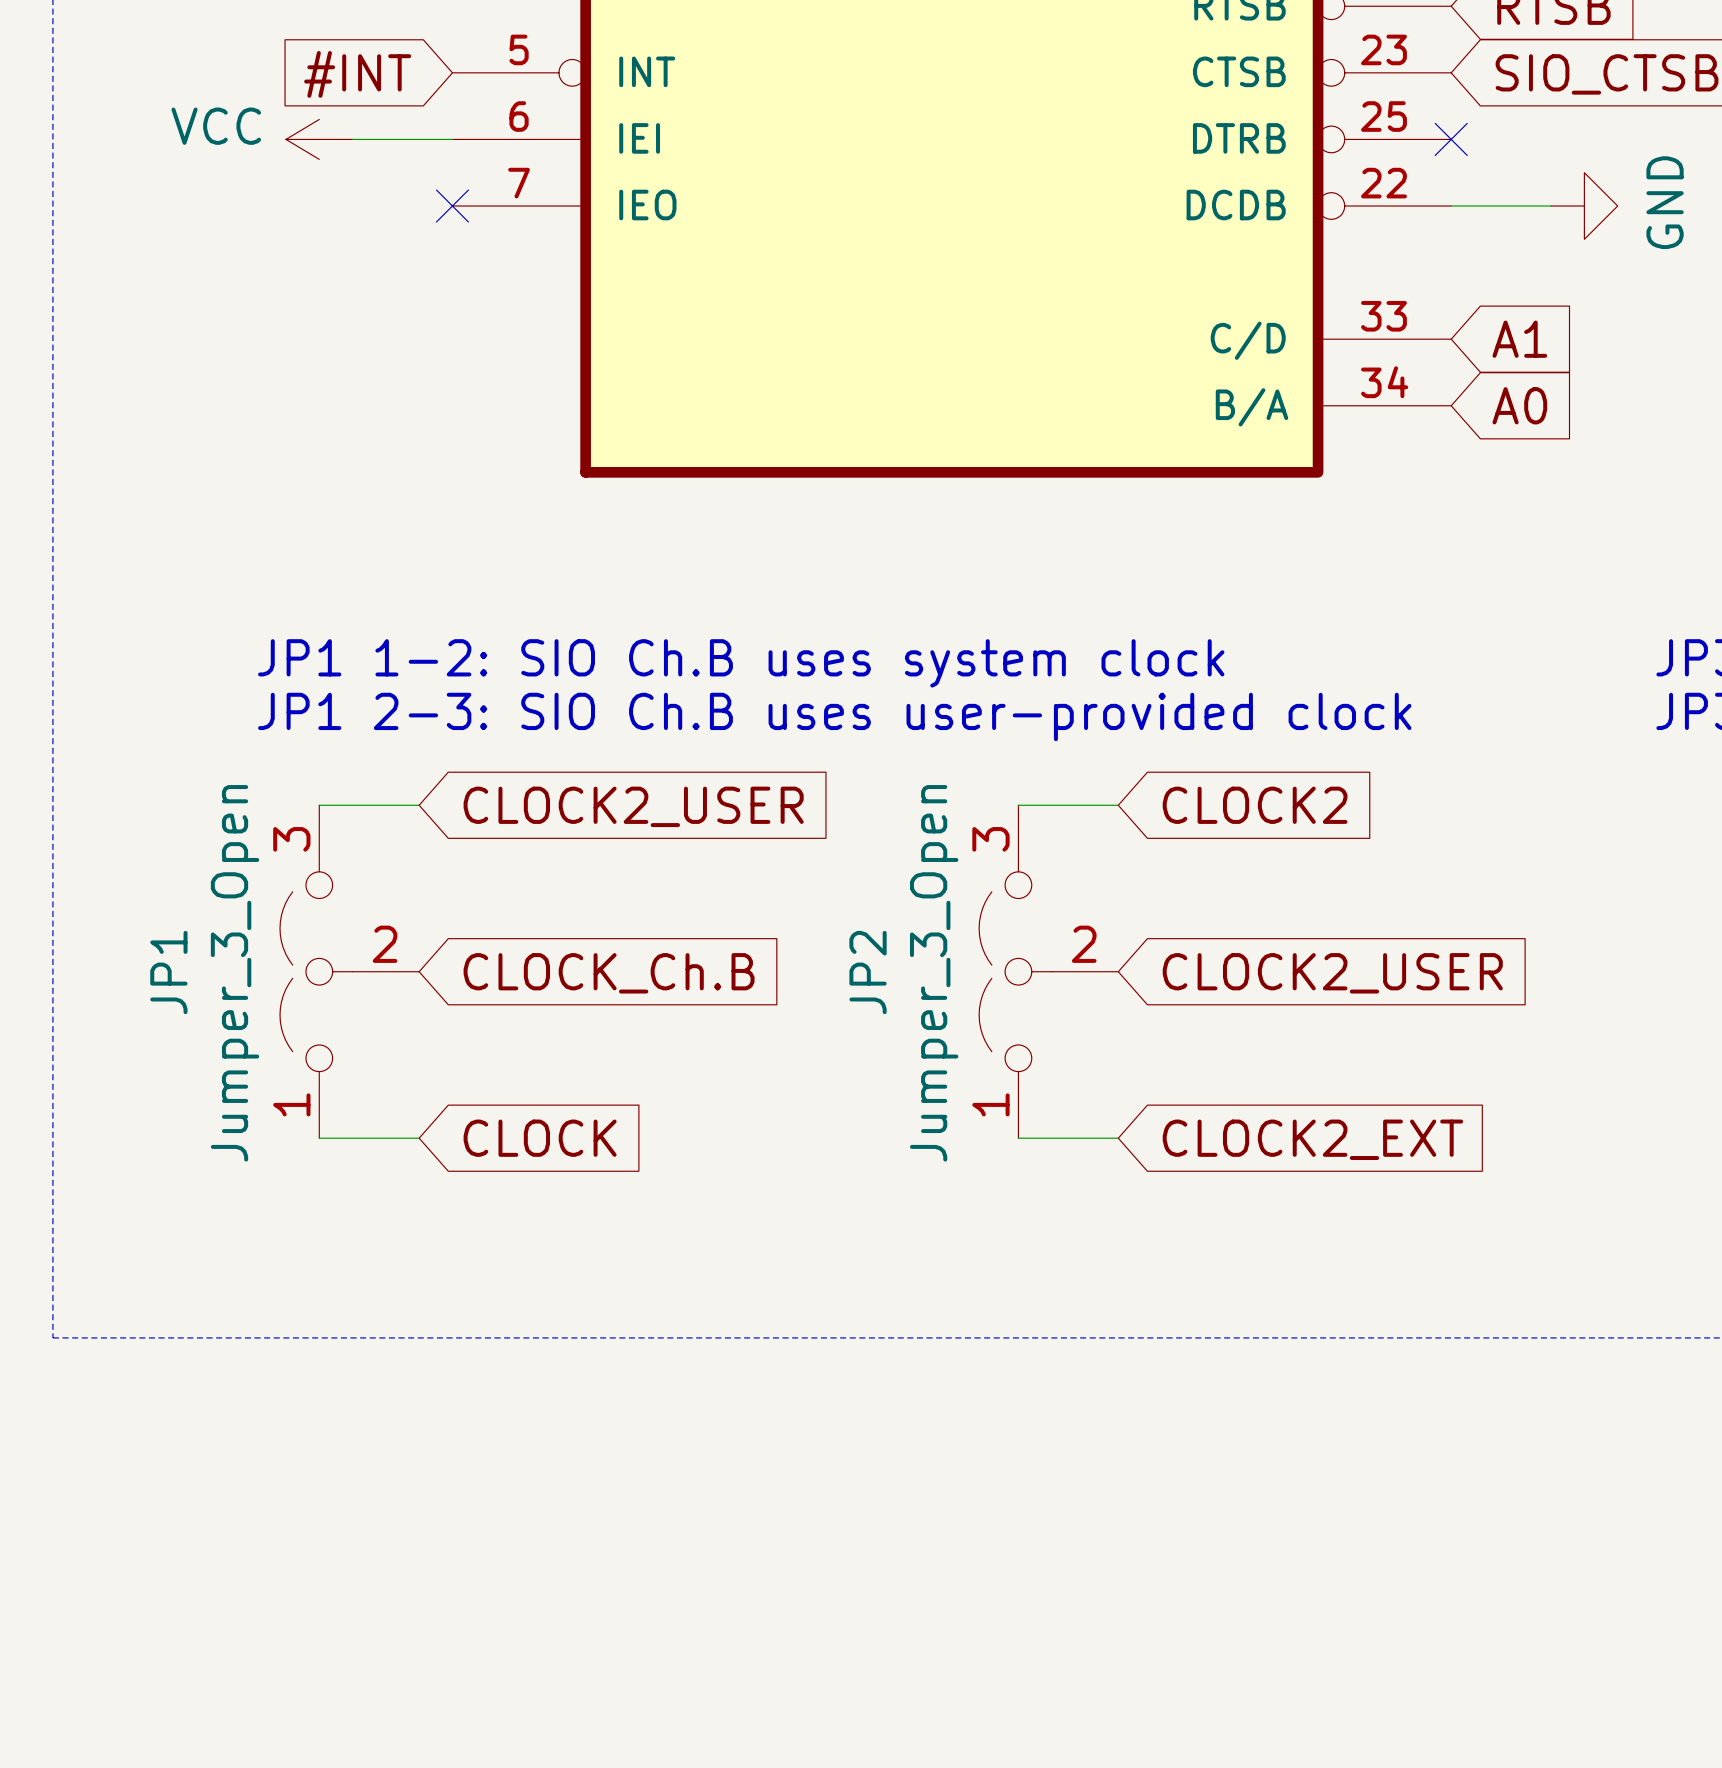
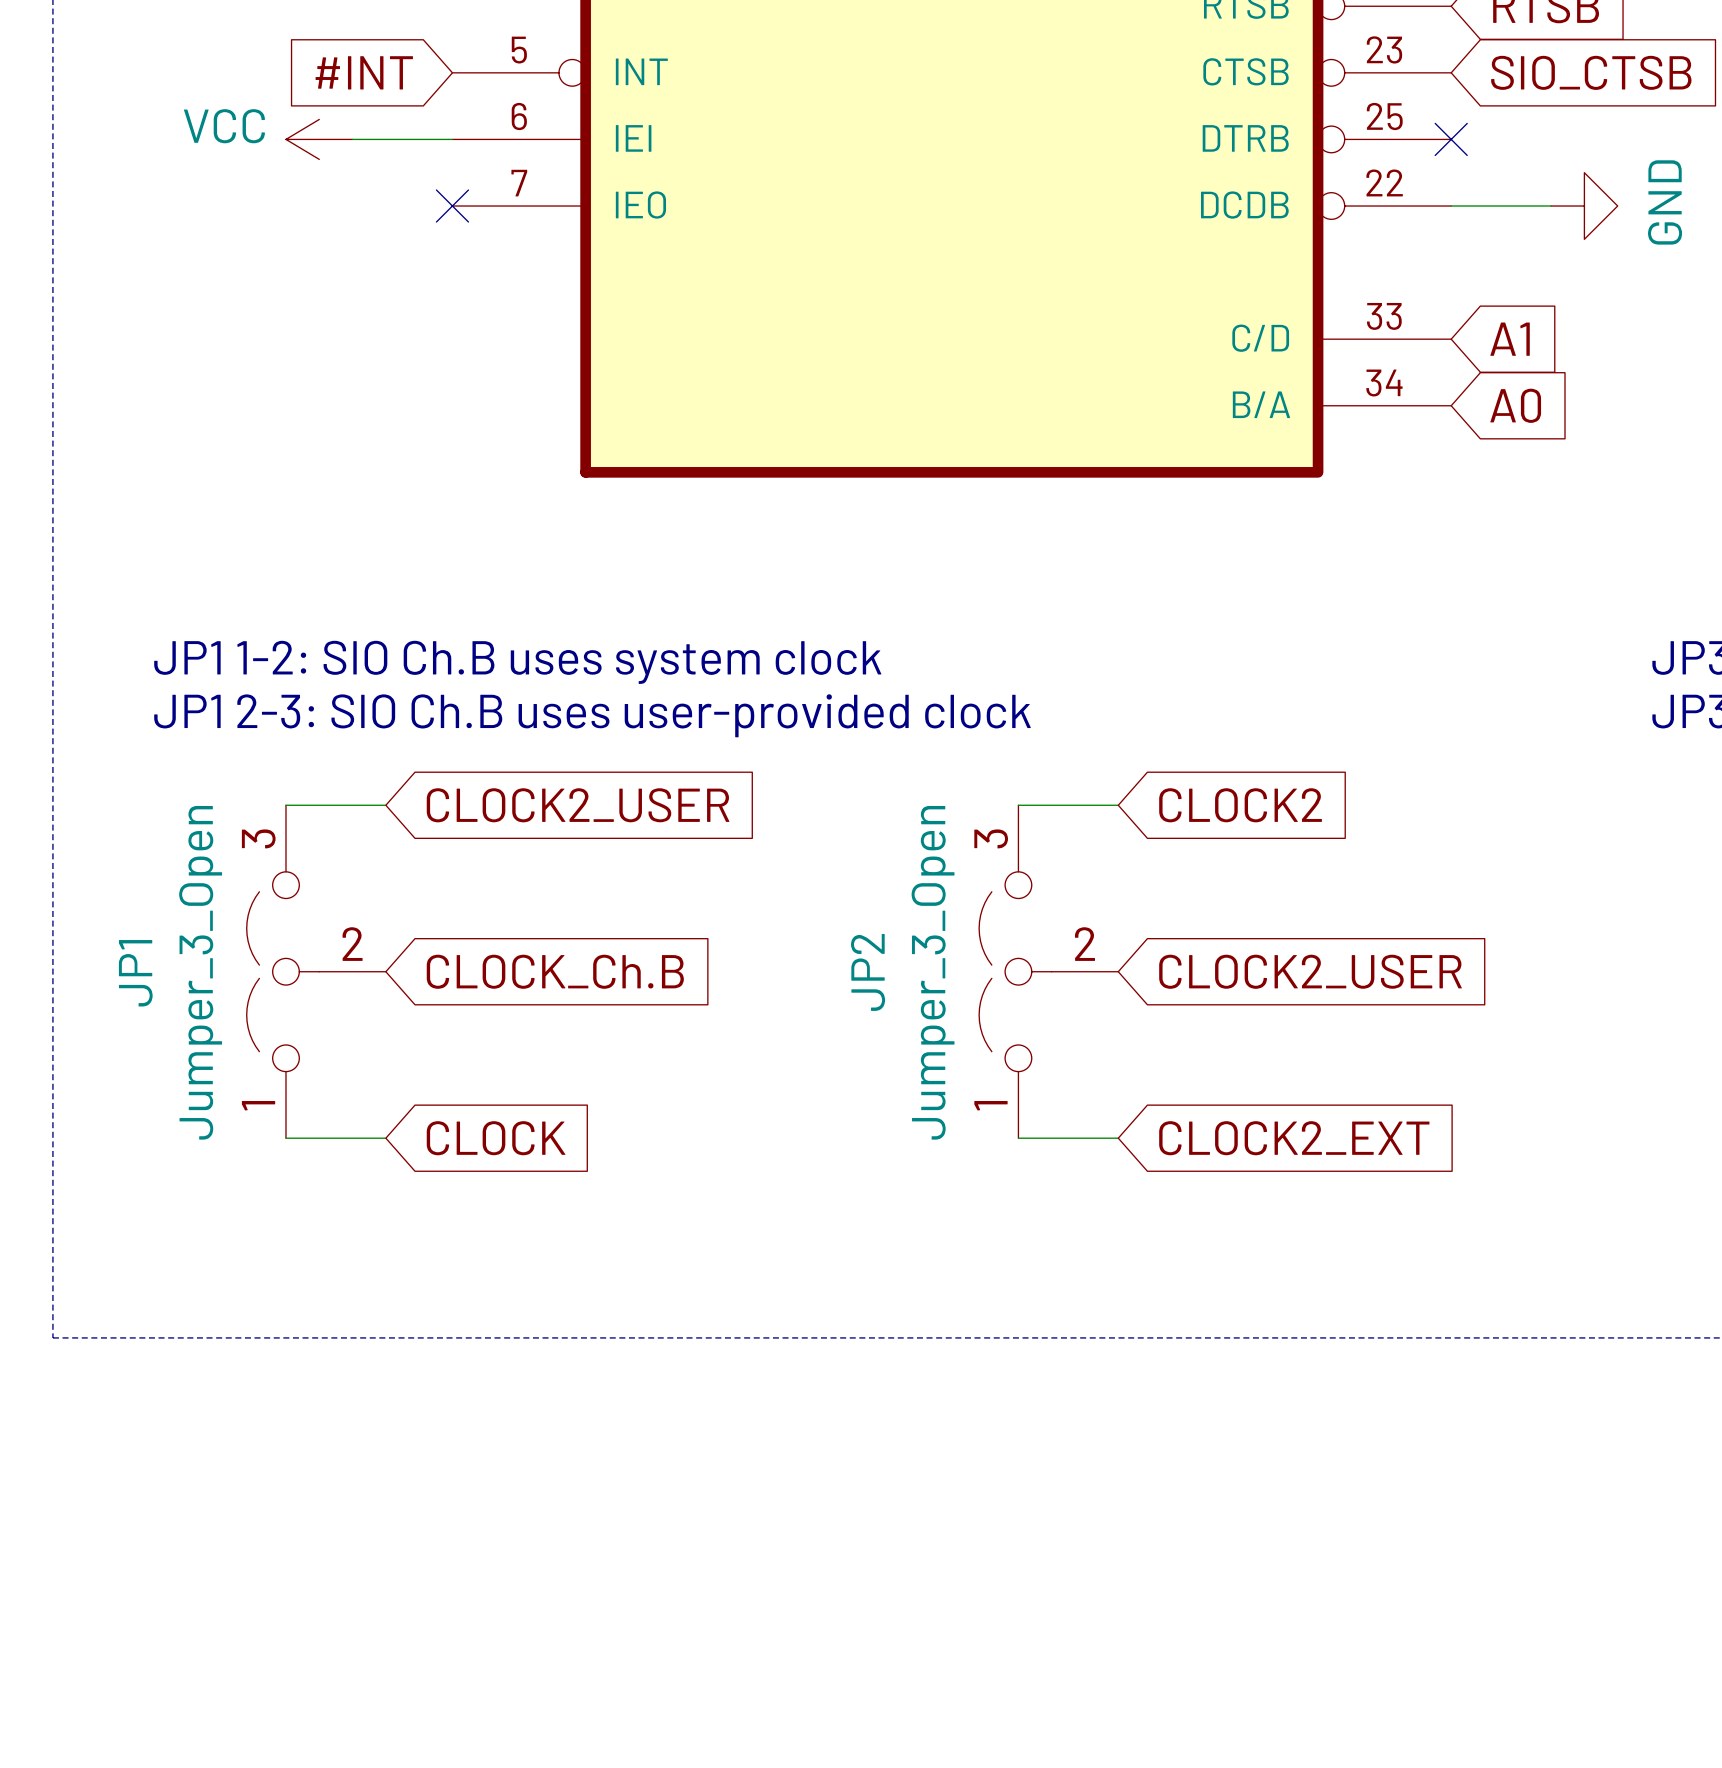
text position: JP1 1-2: SIO Ch.B uses system clock (741, 663) -> JP1 1-2: SIO Ch.B uses system clock (517, 662)
text position: JP1 2-3: SIO Ch.B uses user-provided clock (834, 716) -> JP1 2-3: SIO Ch.B uses user-provided clock (592, 715)
wire: (385, 805) (419, 805) -> (285, 805) (319, 805)
global label position: CLOCK2_USER (633, 806) -> CLOCK2_USER (578, 805)
JP1 position: (349, 971) -> (316, 971)
global label position: CLOCK_Ch.B (609, 973) -> CLOCK_Ch.B (555, 971)
wire: (385, 1138) (419, 1138) -> (285, 1138) (319, 1138)
global label position: CLOCK (540, 1138) -> CLOCK (496, 1138)

